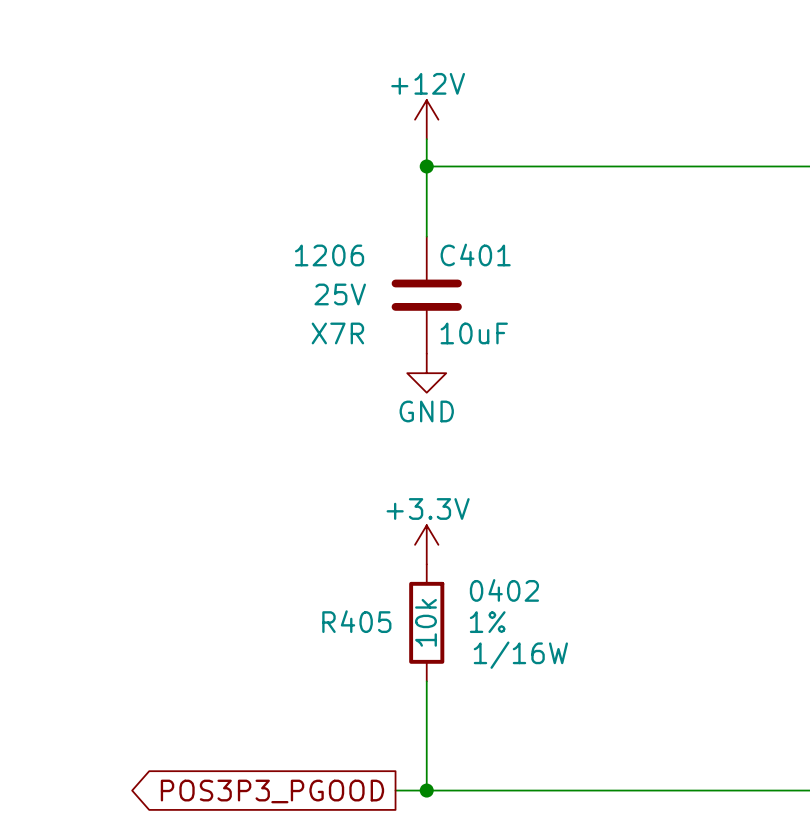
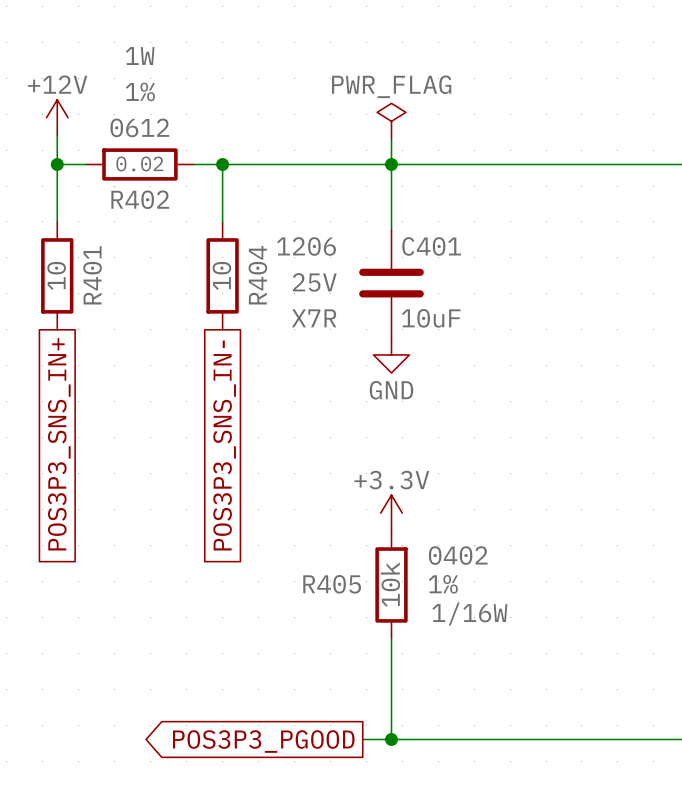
power symbol: none -> +12V (57, 117)
power symbol: +12V (426, 119) -> PWR_FLAG (391, 121)
wire: none -> (57, 135) (57, 221)
wire: none -> (57, 164) (86, 164)
junction: none -> (57, 164)
R402: none -> 0.02 (139, 164)
wire: none -> (193, 164) (391, 164)
wire: none -> (222, 164) (222, 221)
junction: none -> (222, 164)
R401: none -> 10 (57, 275)
R404: none -> 10 (222, 275)
global label: none -> POS3P3_SNS_IN+ (59, 444)
global label: none -> POS3P3_SNS_IN- (224, 445)

